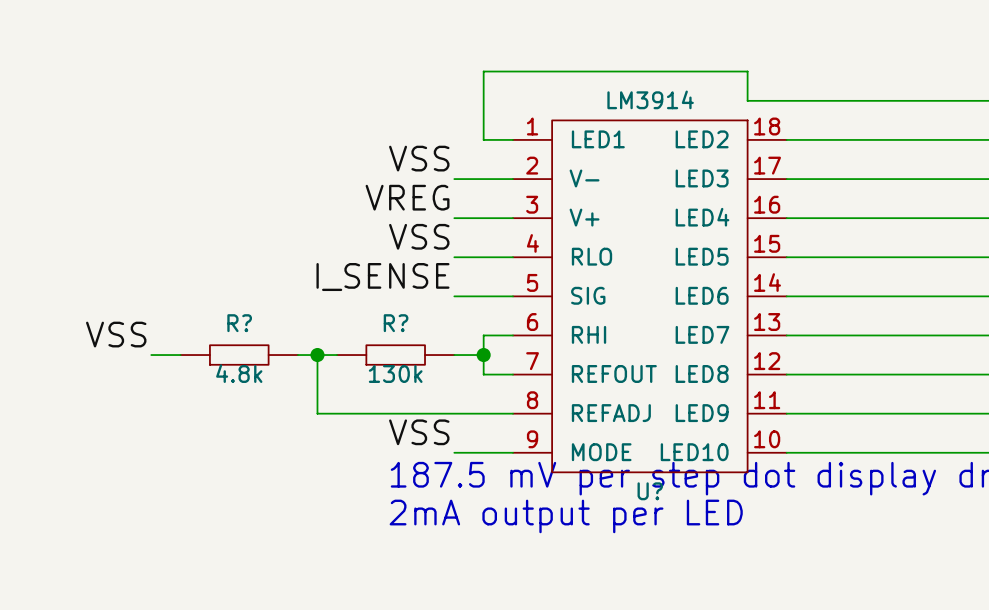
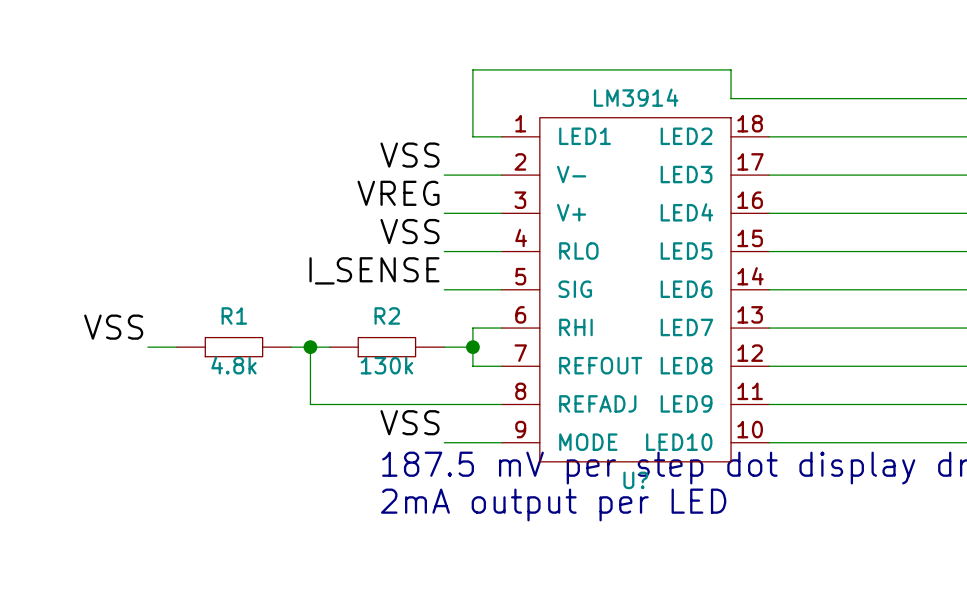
R? name: R? (239, 323) -> R1 (234, 315)
R? name: R? (396, 323) -> R2 (387, 315)

